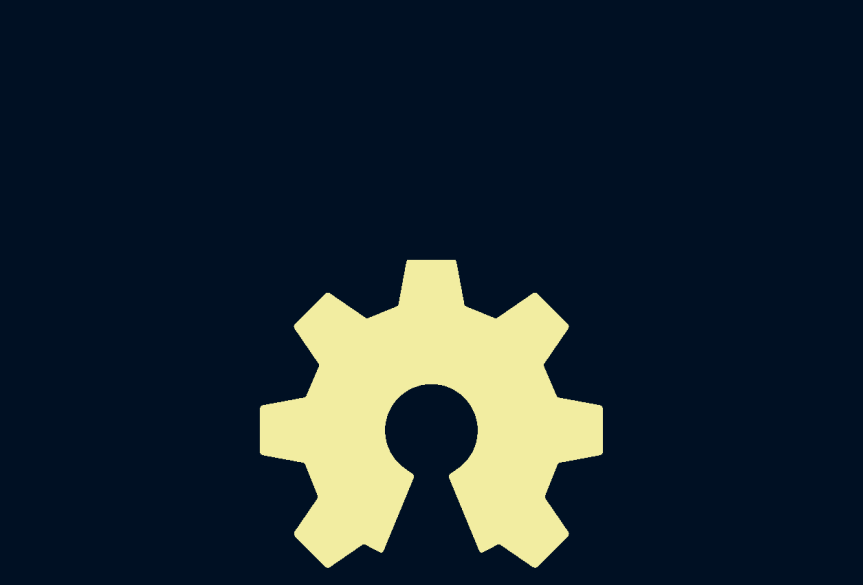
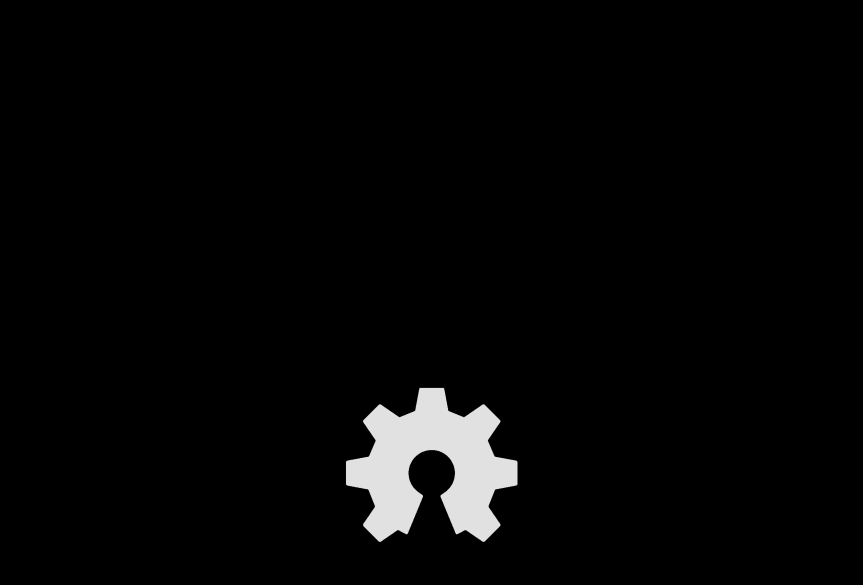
drawing shape: [259, 259, 603, 568] -> [345, 387, 518, 542]

